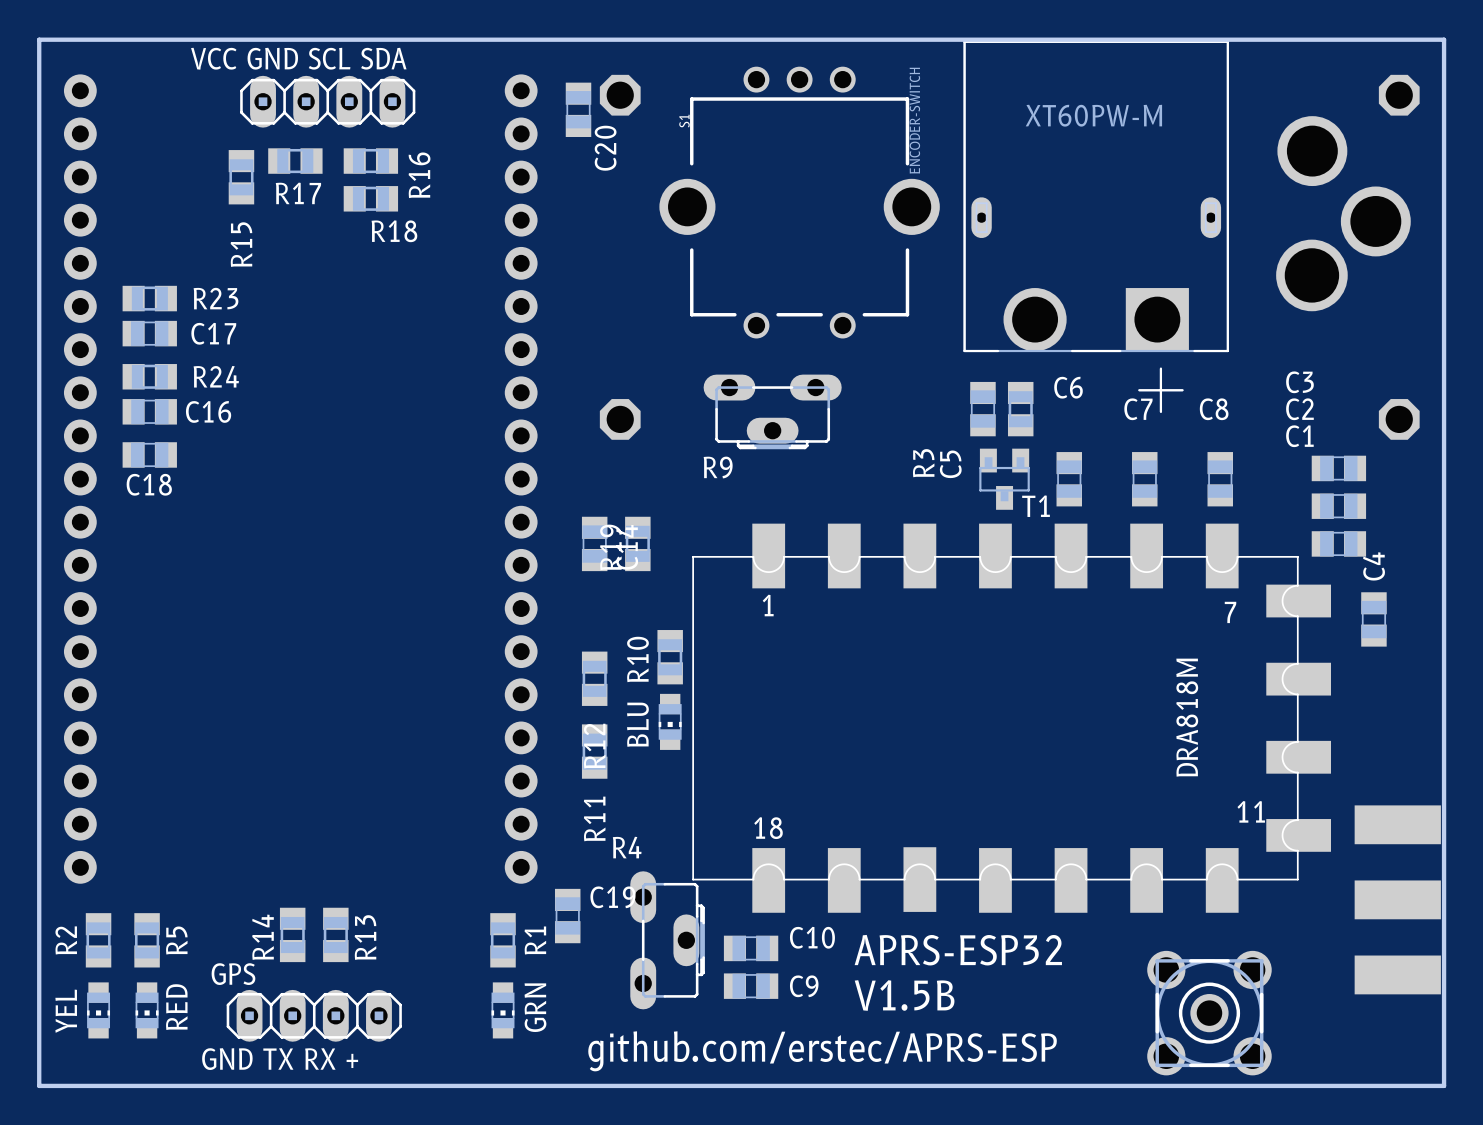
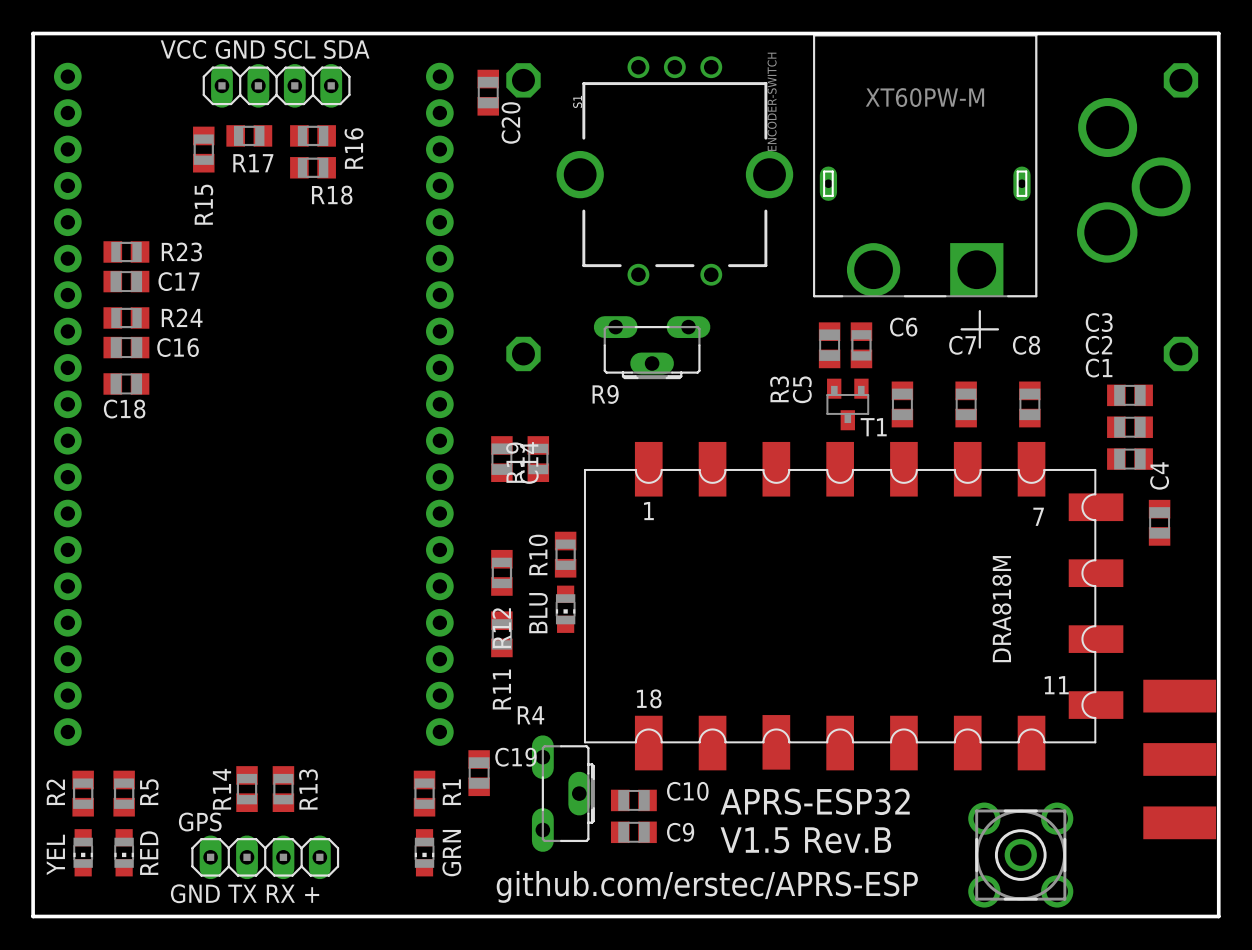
text: V1.5B (904, 995) -> V1.5 Rev.B (805, 840)

